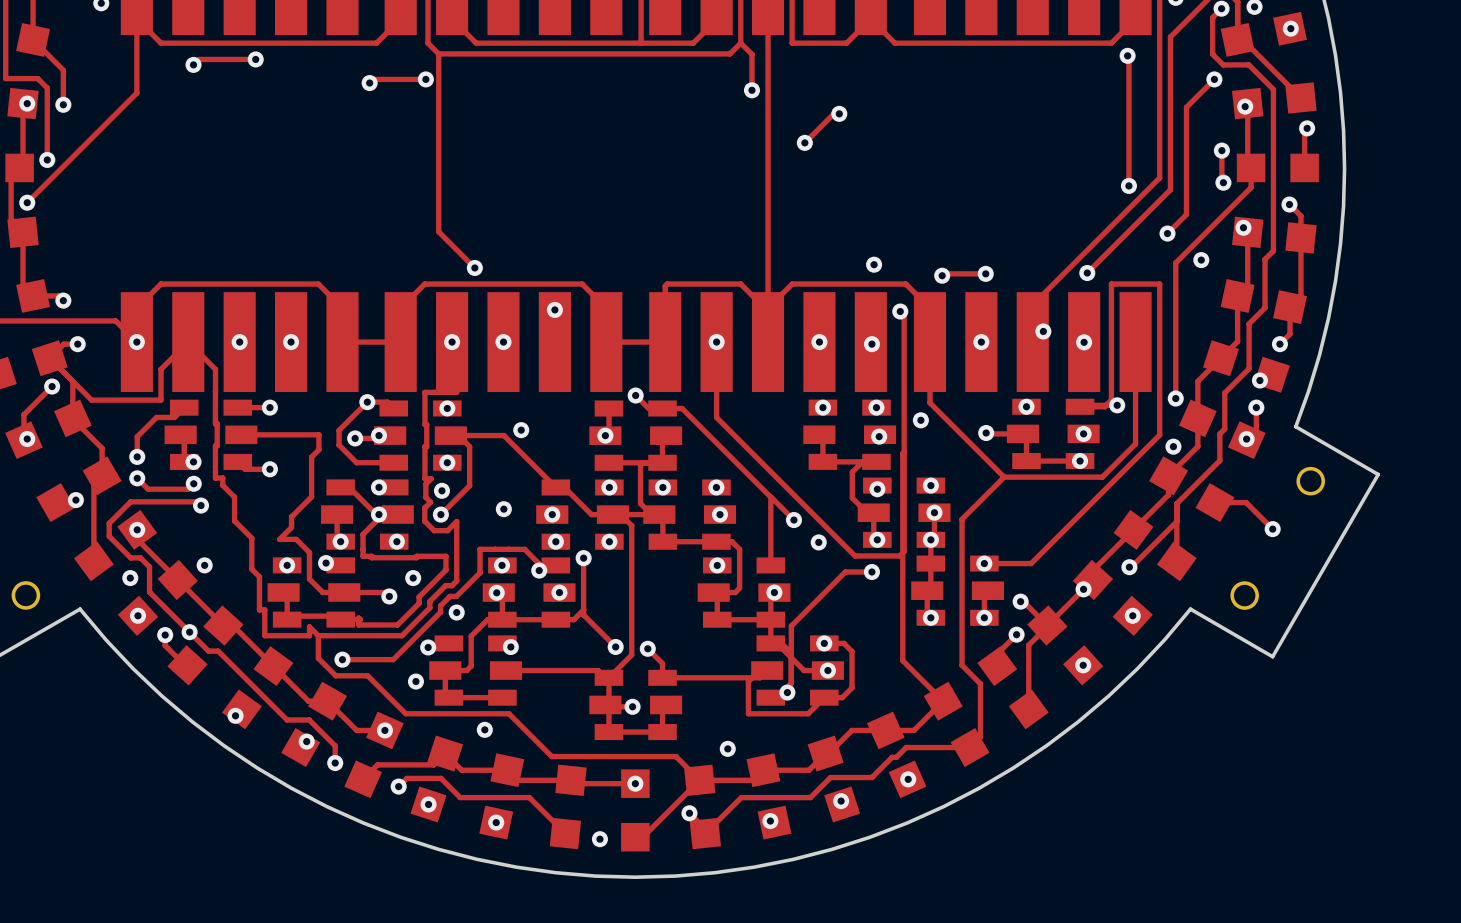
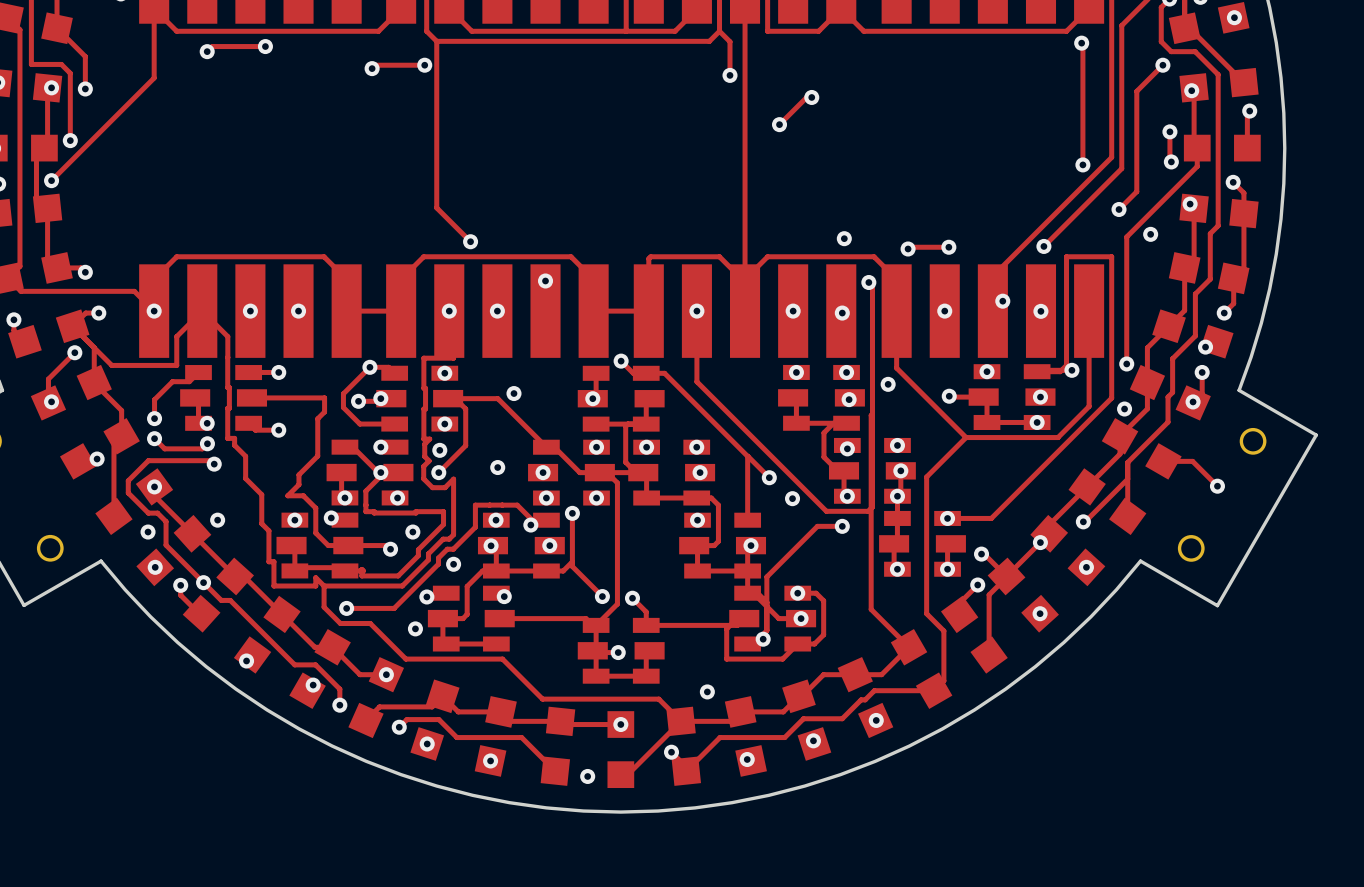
via: (484, 729) -> none

